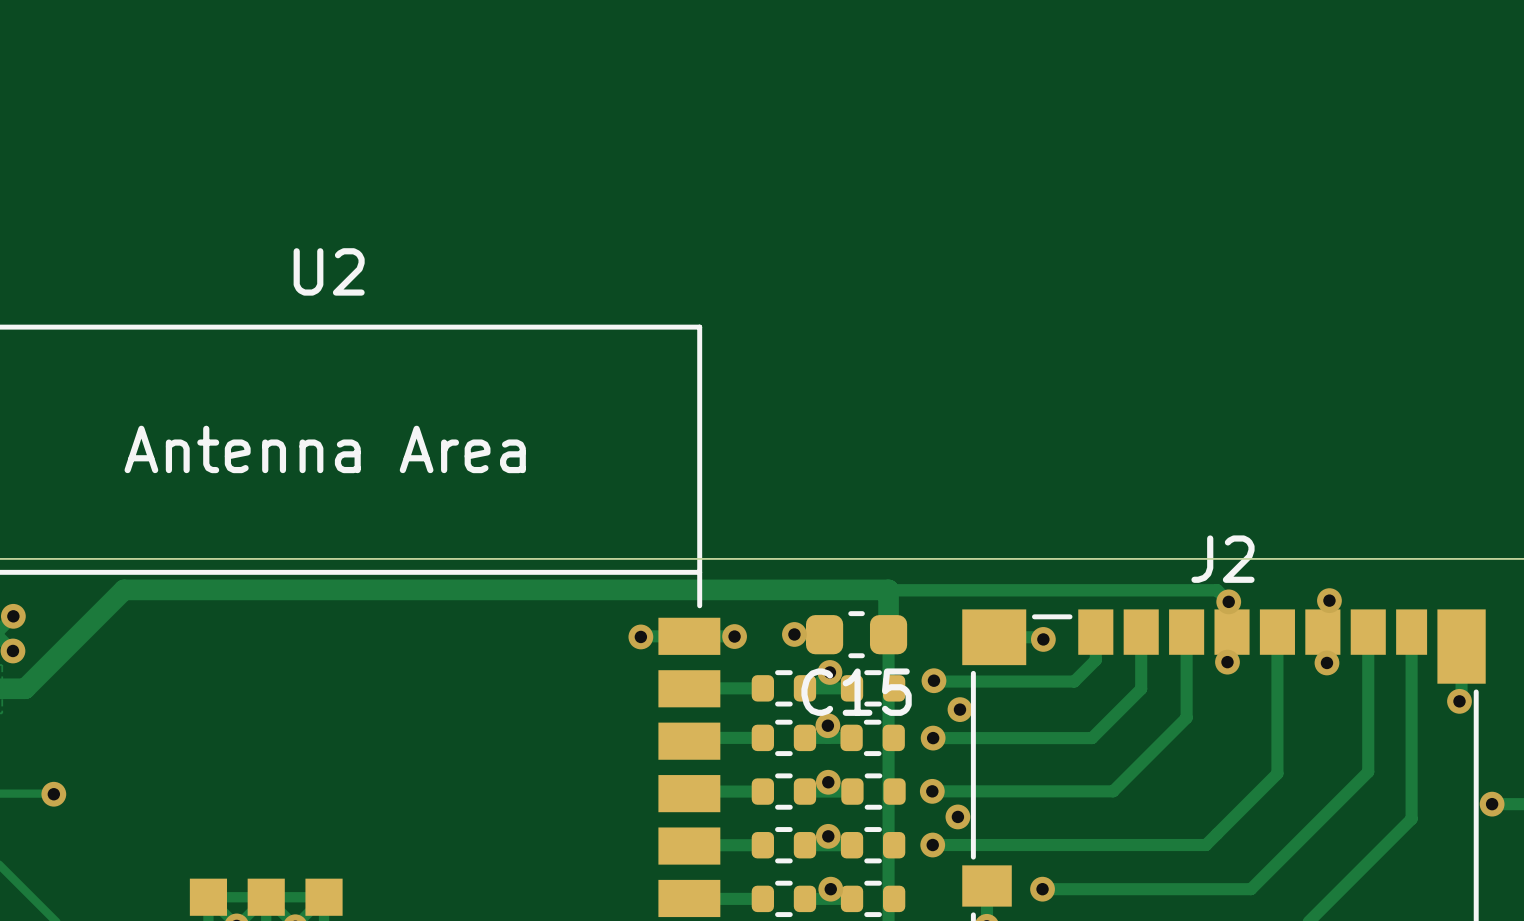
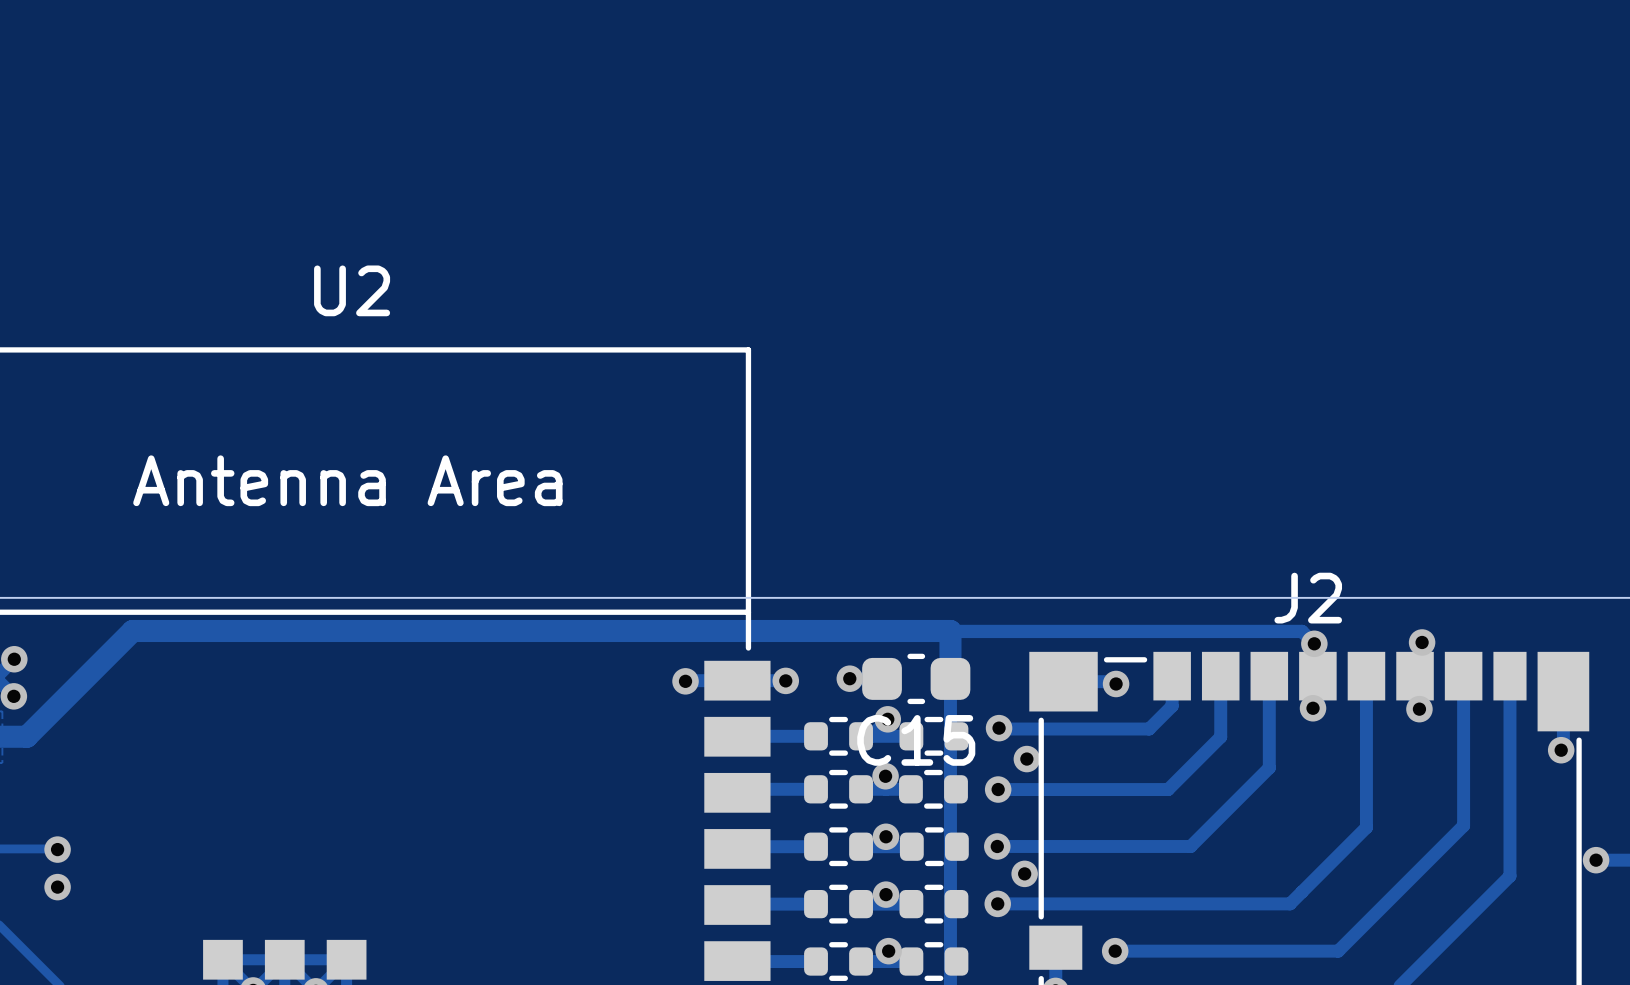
via: none -> (57, 887)

